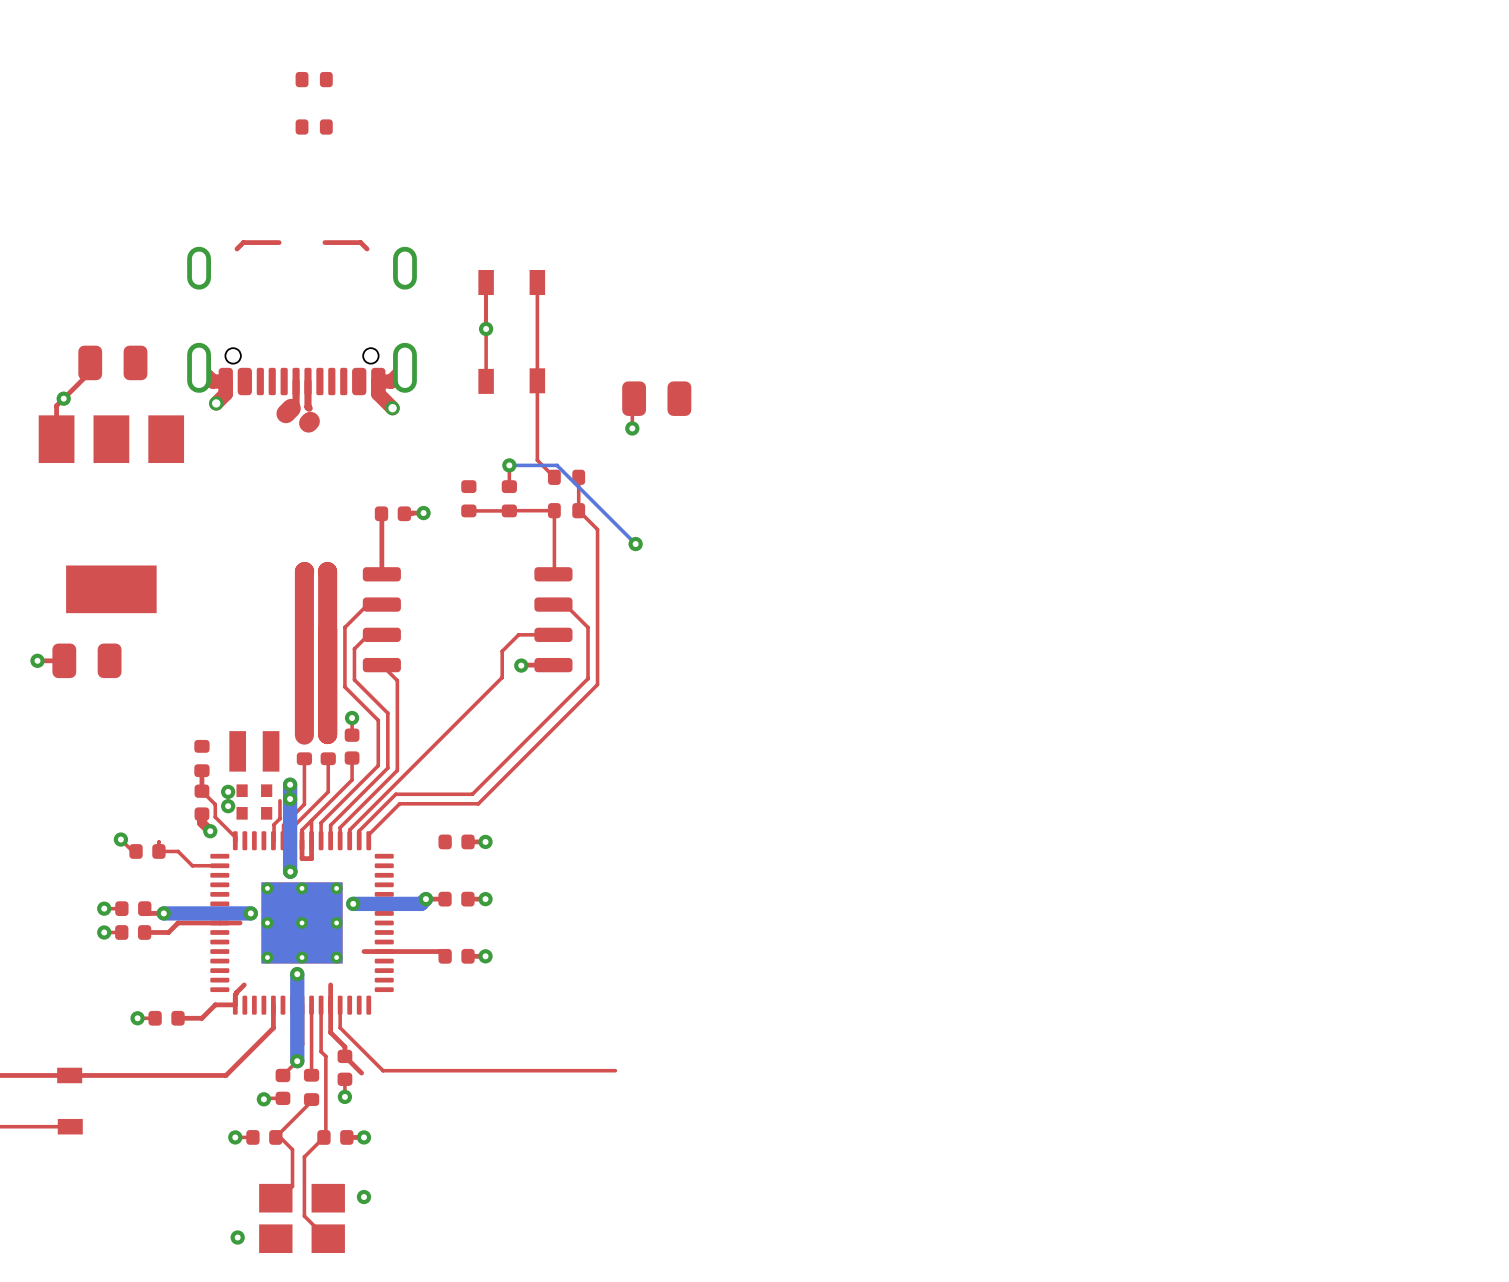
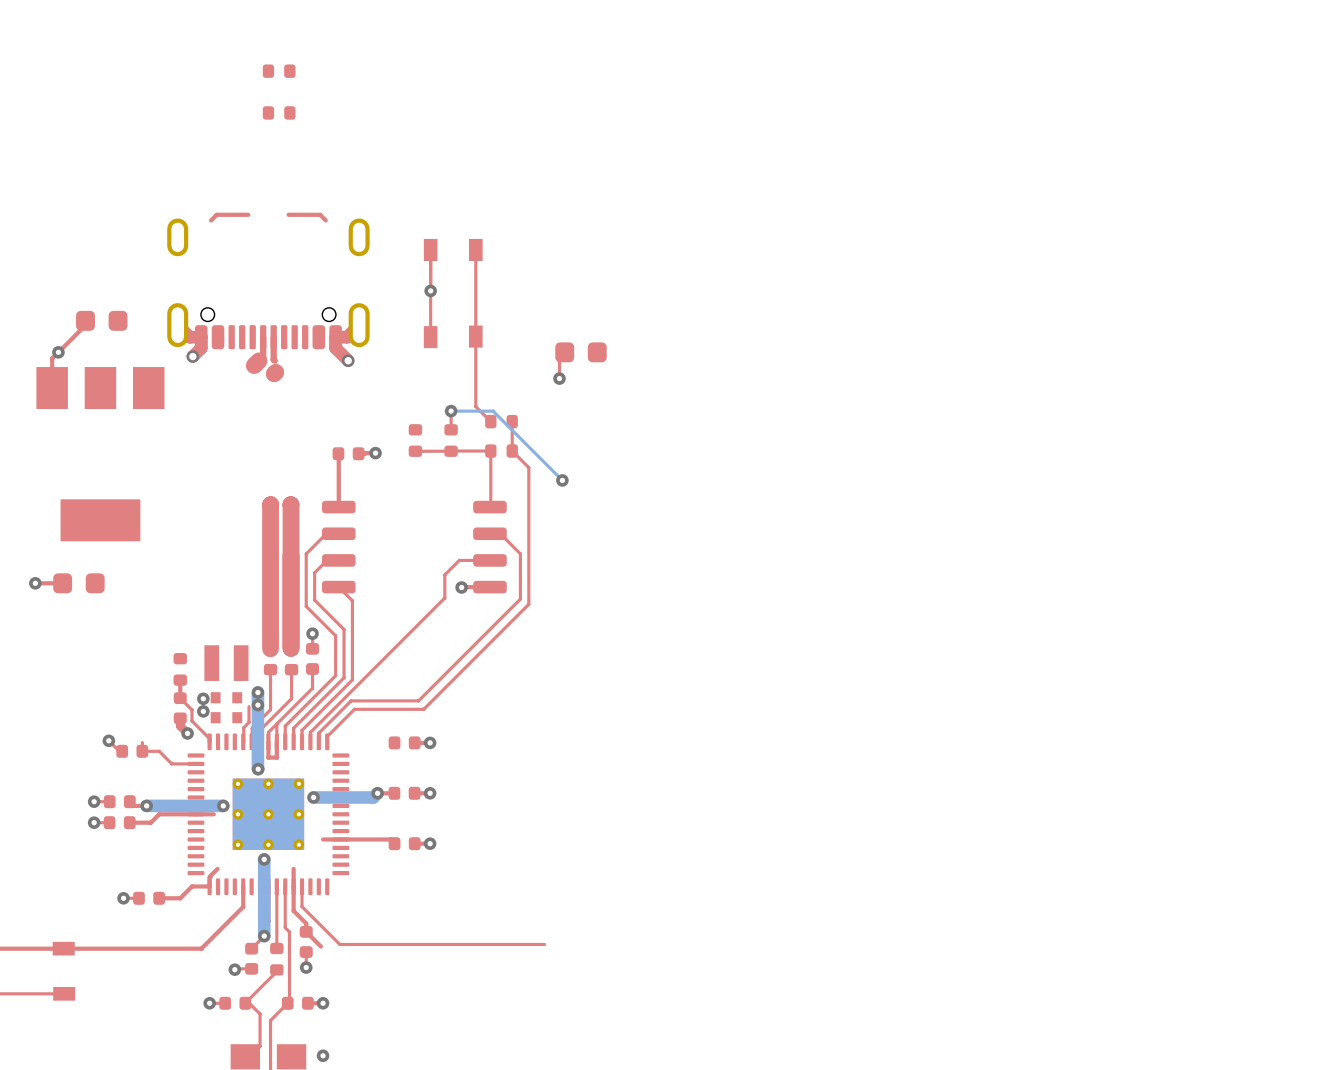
part footprint: [78, 345, 148, 381] -> [76, 310, 128, 331]
part footprint: [622, 381, 692, 416] -> [555, 342, 607, 363]
part footprint: [52, 643, 122, 679] -> [53, 573, 105, 594]

